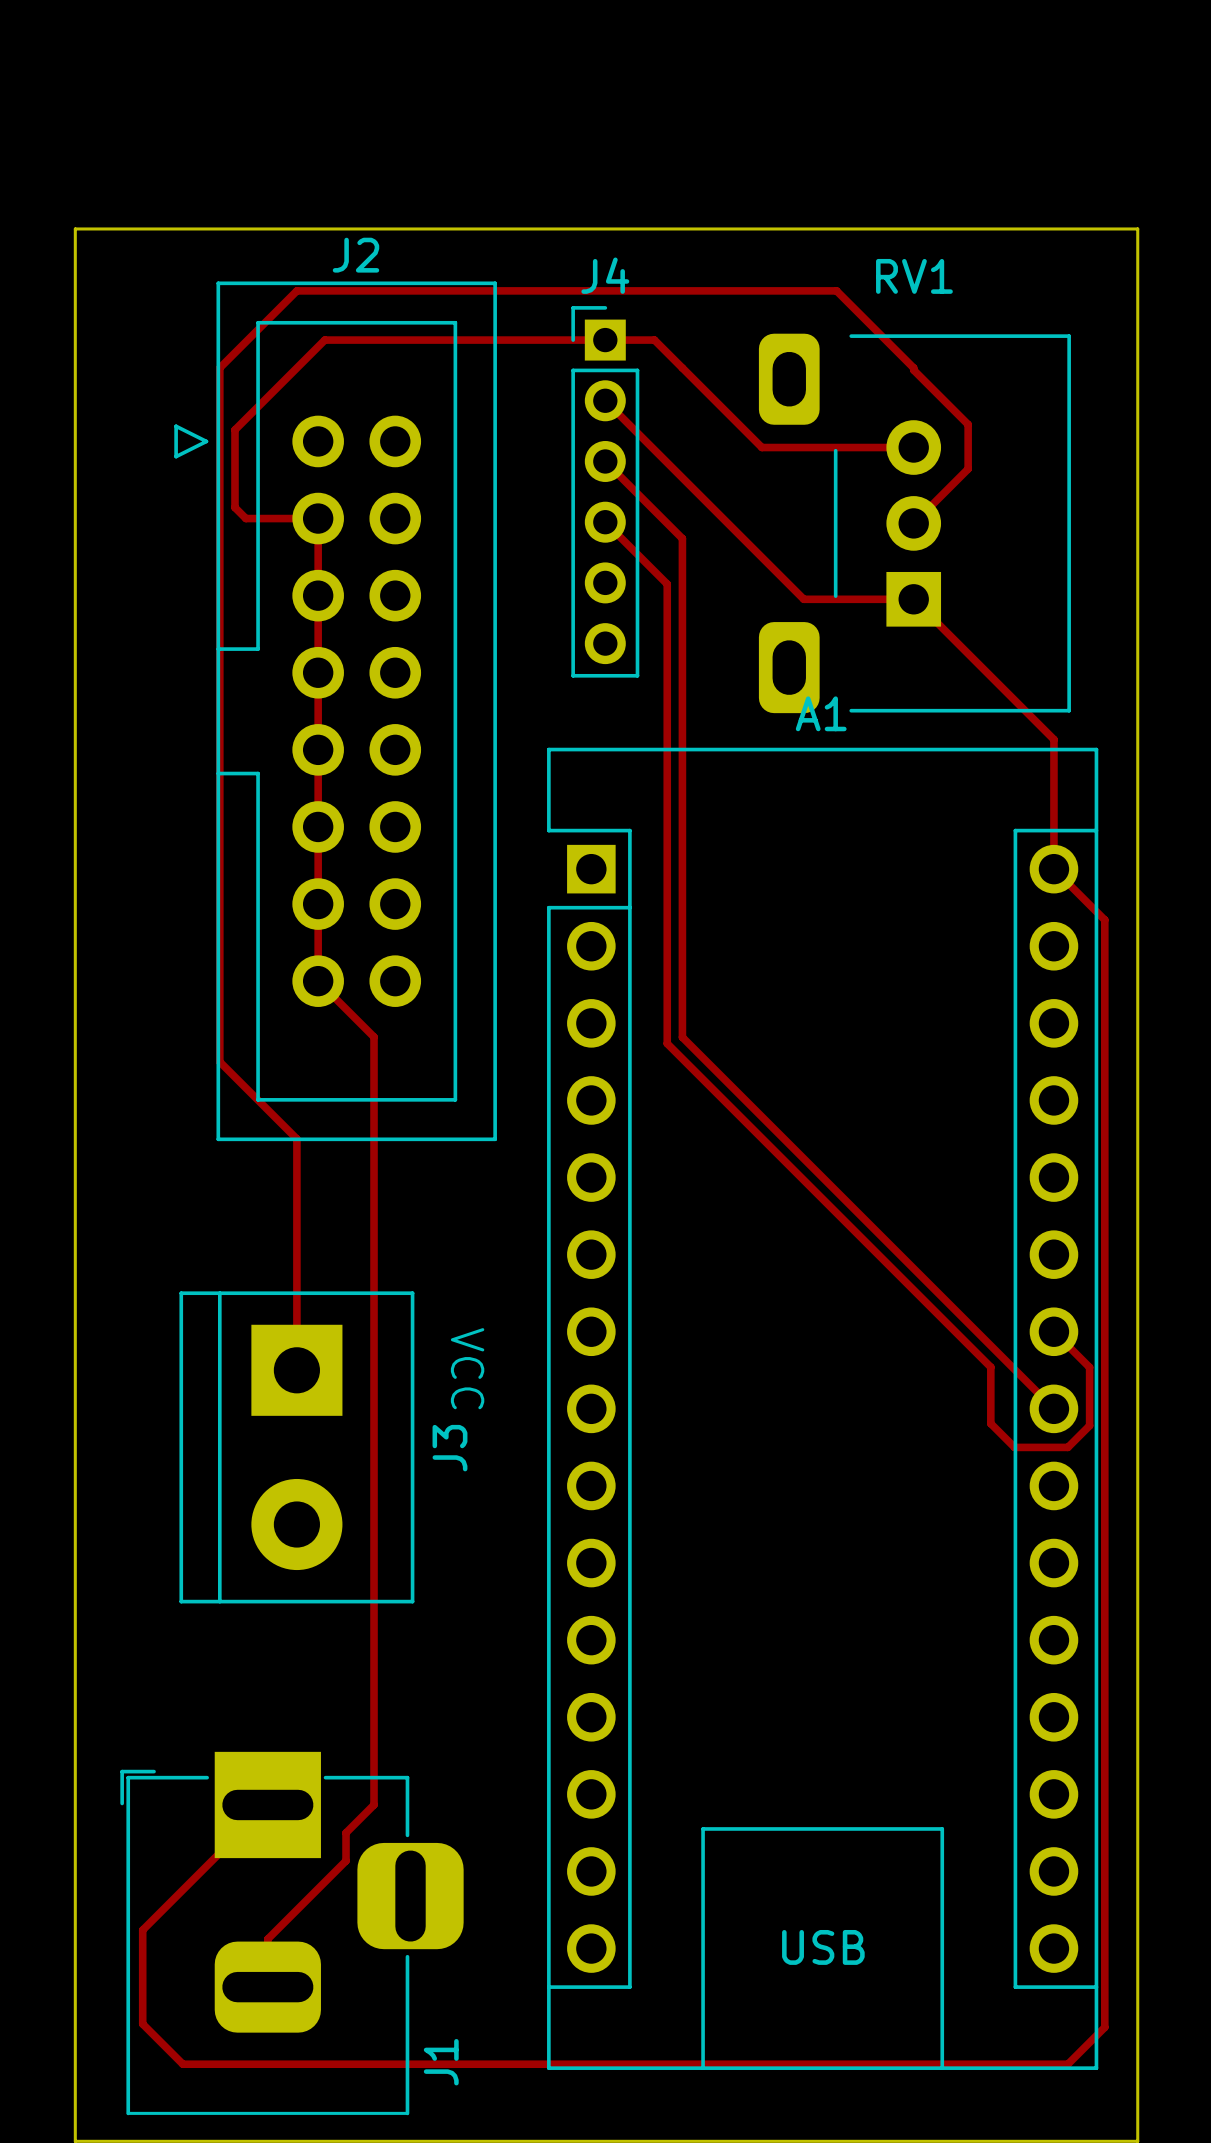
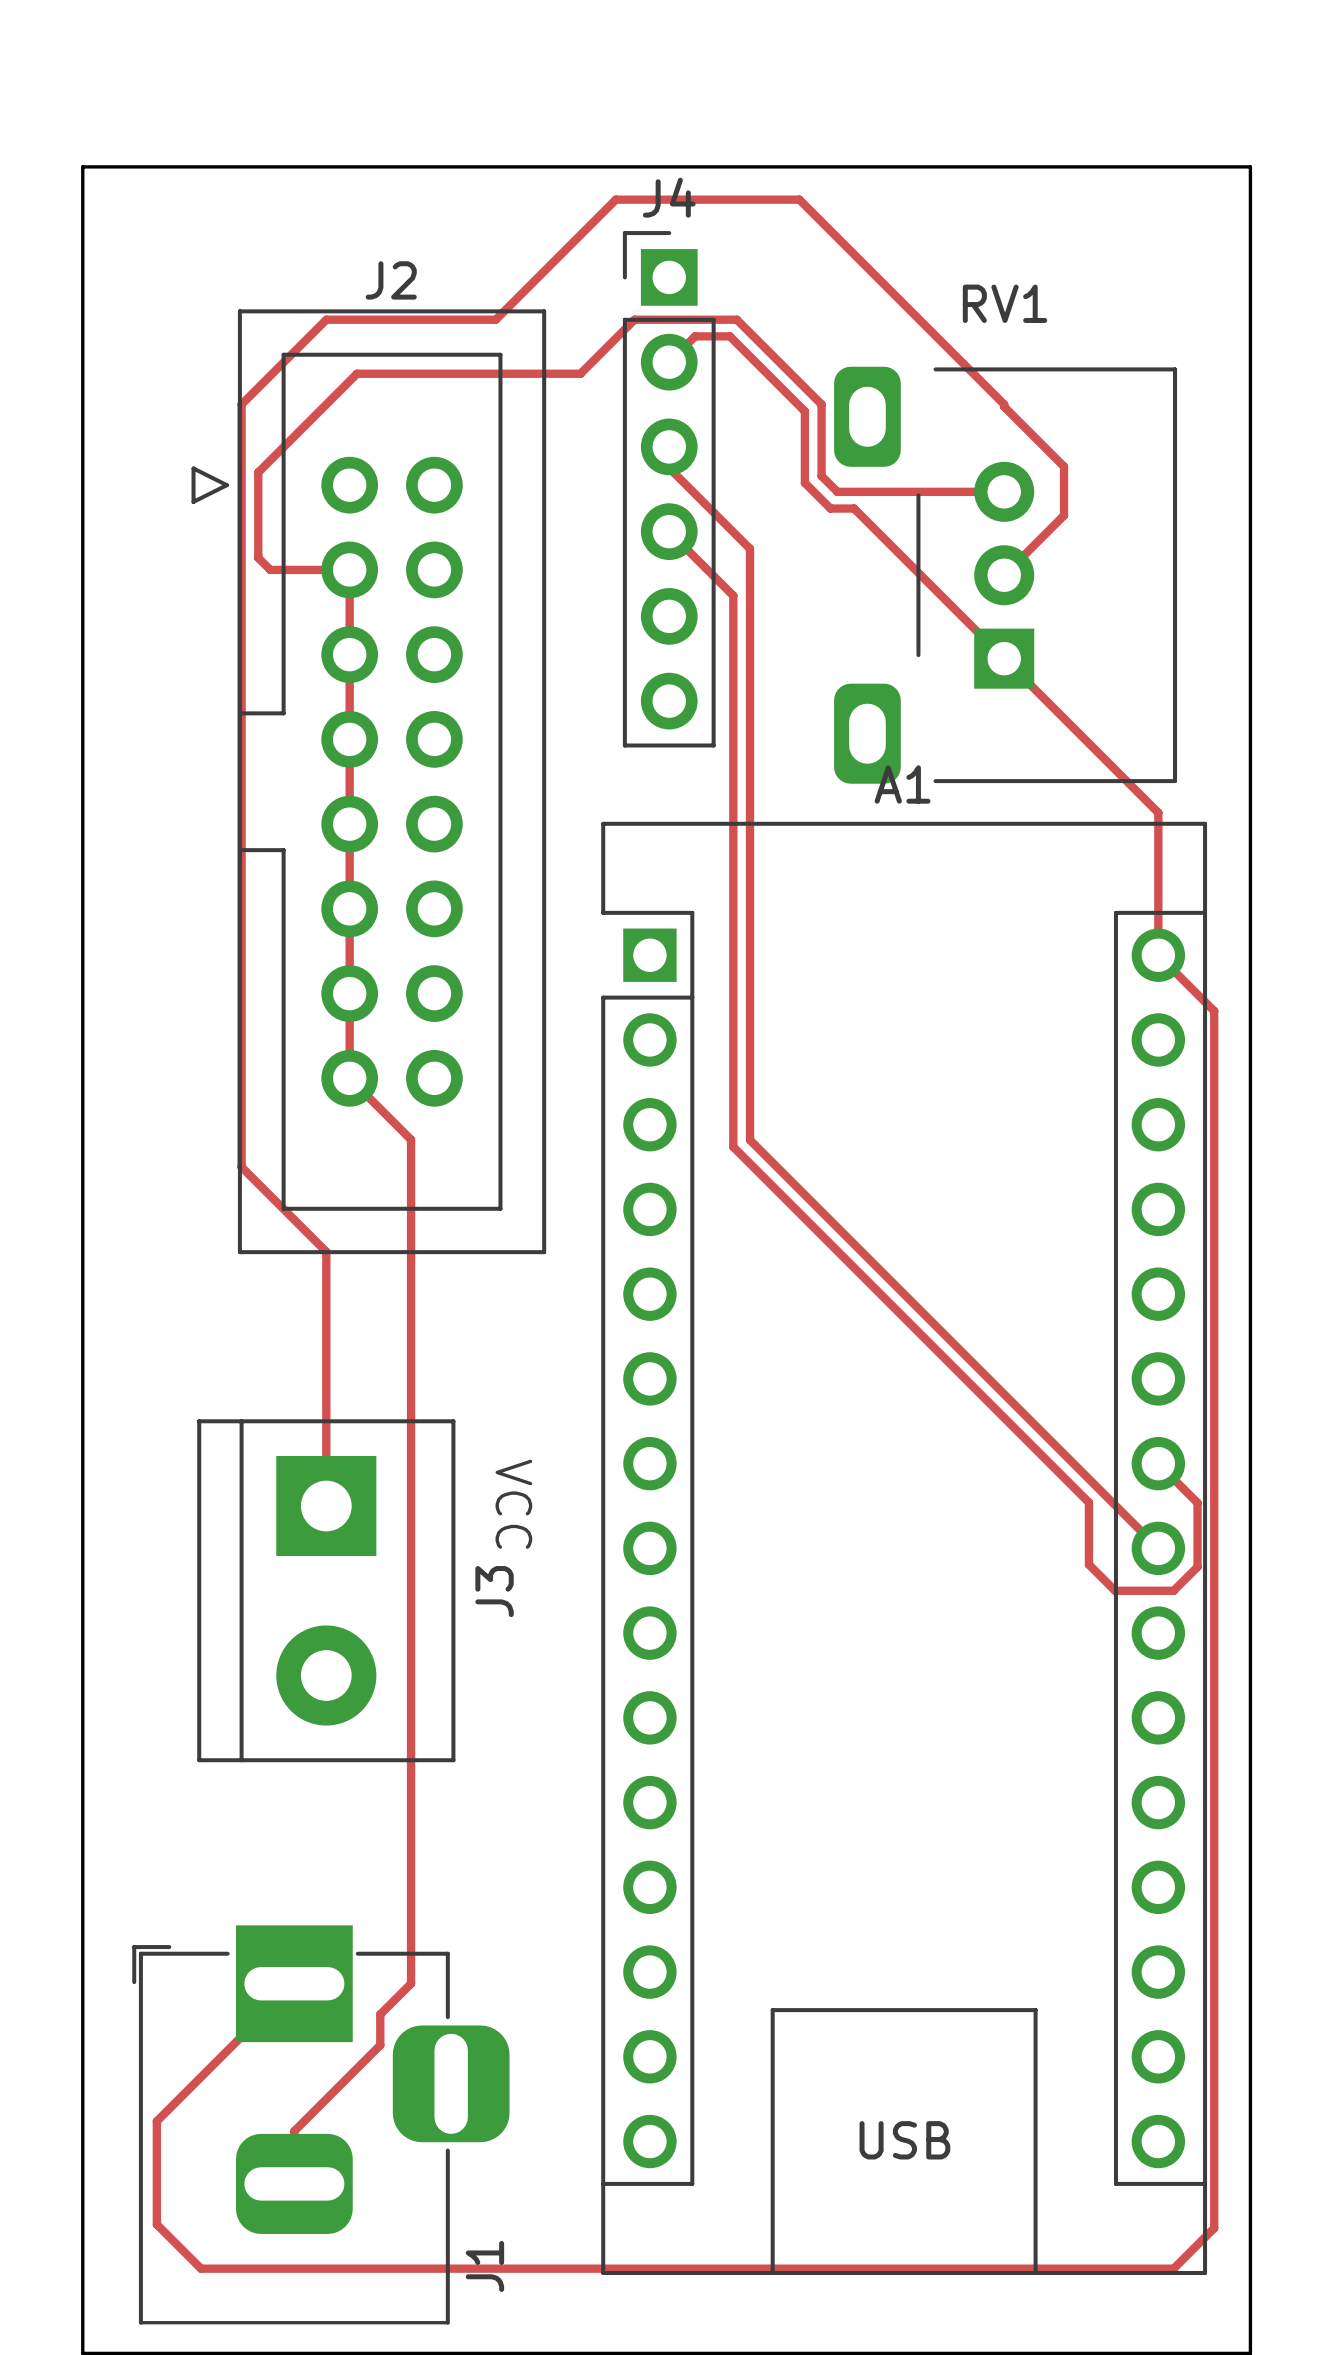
board edge: (75, 228) (1137, 228) -> (82, 251) (82, 166) (1250, 166) (1250, 251)
track: (451, 290) (577, 290) -> (580, 373) (634, 319)
track: (670, 290) (836, 290) -> (495, 319) (615, 199) (799, 199) (919, 319)
J4 footprint: [571, 306, 640, 678] -> [622, 231, 716, 748]
track: (528, 340) (654, 340) (747, 433) -> (736, 319) (821, 404) (821, 476)
track: (605, 400) (803, 599) (913, 599) -> (669, 362) (695, 336) (729, 336) (804, 411) (804, 482) (830, 508) (854, 508) (1004, 658)
track: (605, 461) (682, 538) -> (669, 446) (669, 468) (750, 548) (750, 591)
track: (605, 522) (667, 584) -> (669, 531) (733, 595) (733, 641)

